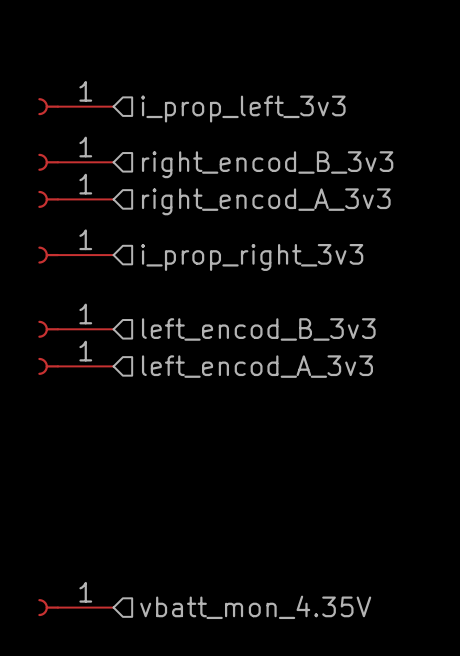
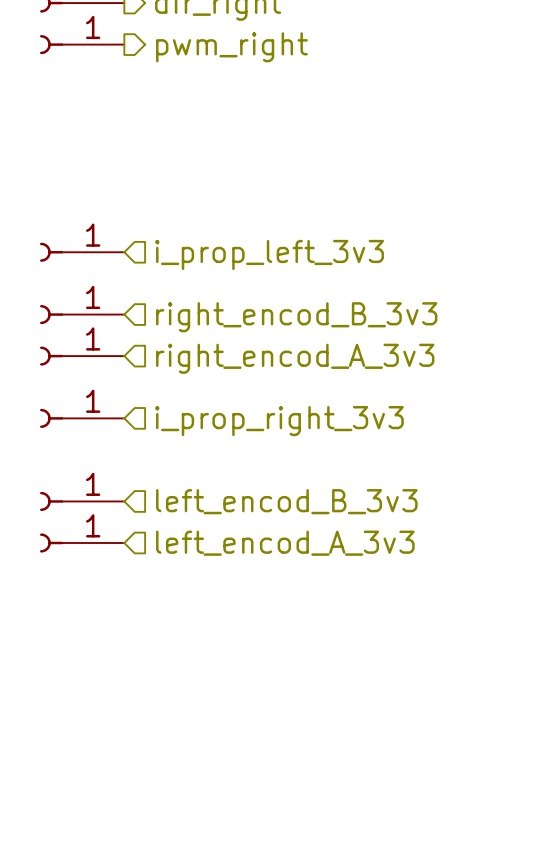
part: (75, 607) -> none
hierarchical label: vbatt_mon_4.35V (255, 607) -> none

